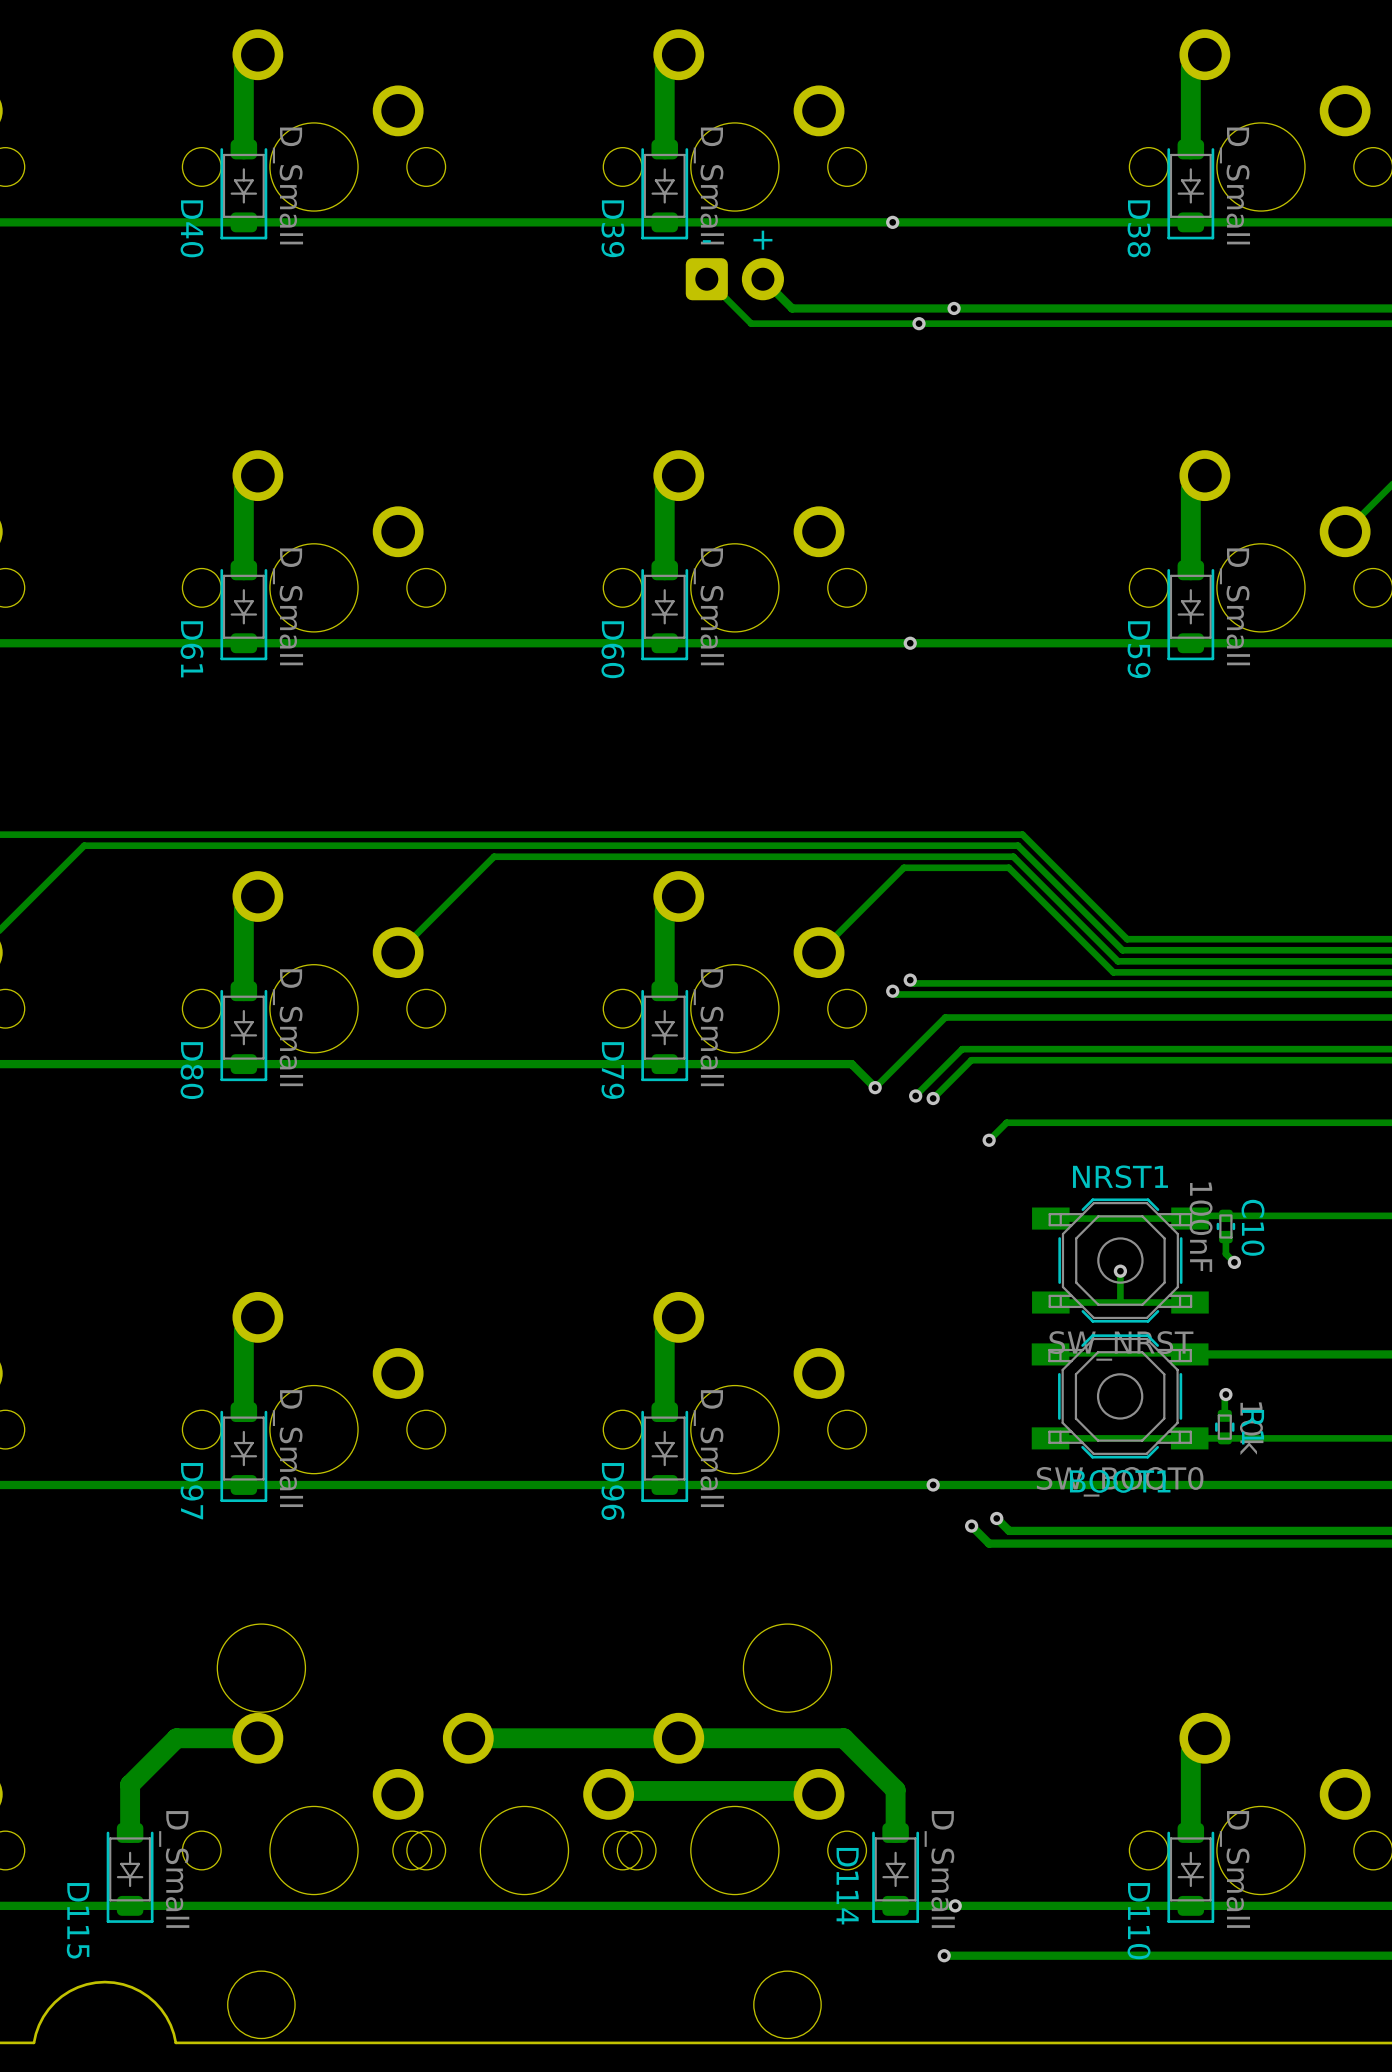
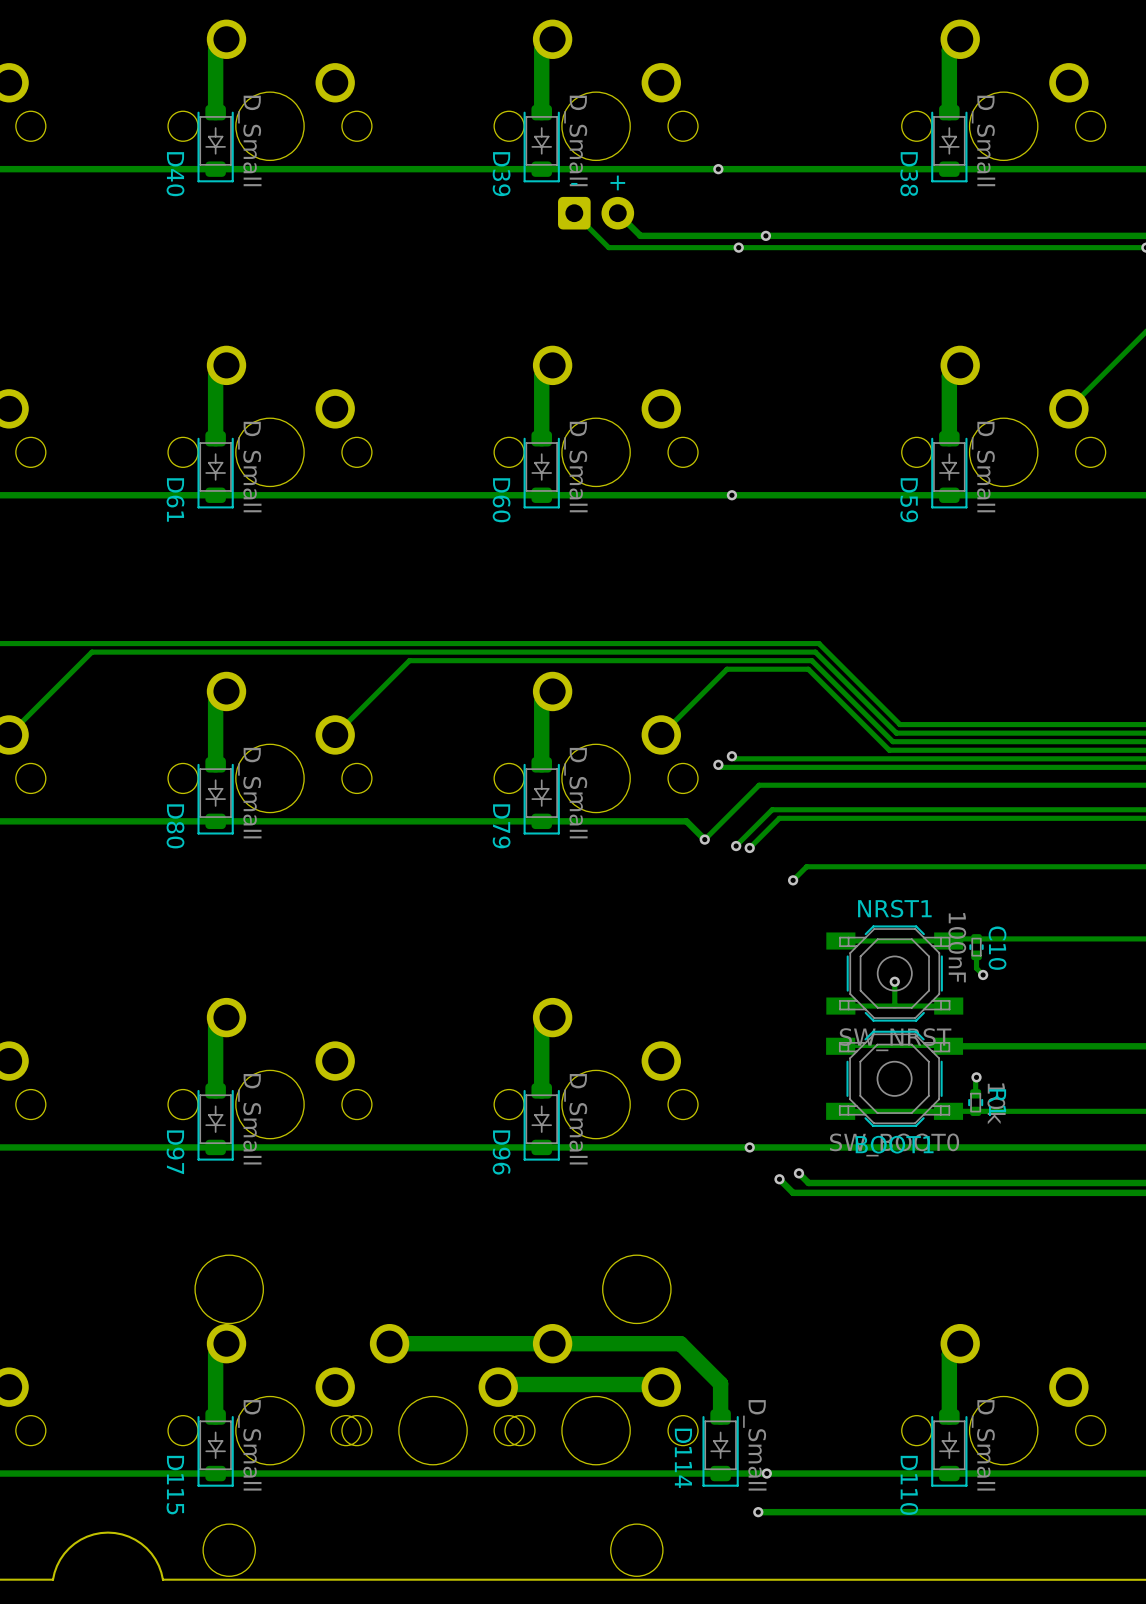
track: (257, 1738) (176, 1738) (130, 1784) (130, 1832) -> (226, 1343) (215, 1354) (215, 1417)
D115 position: (130, 1872) -> (215, 1448)

